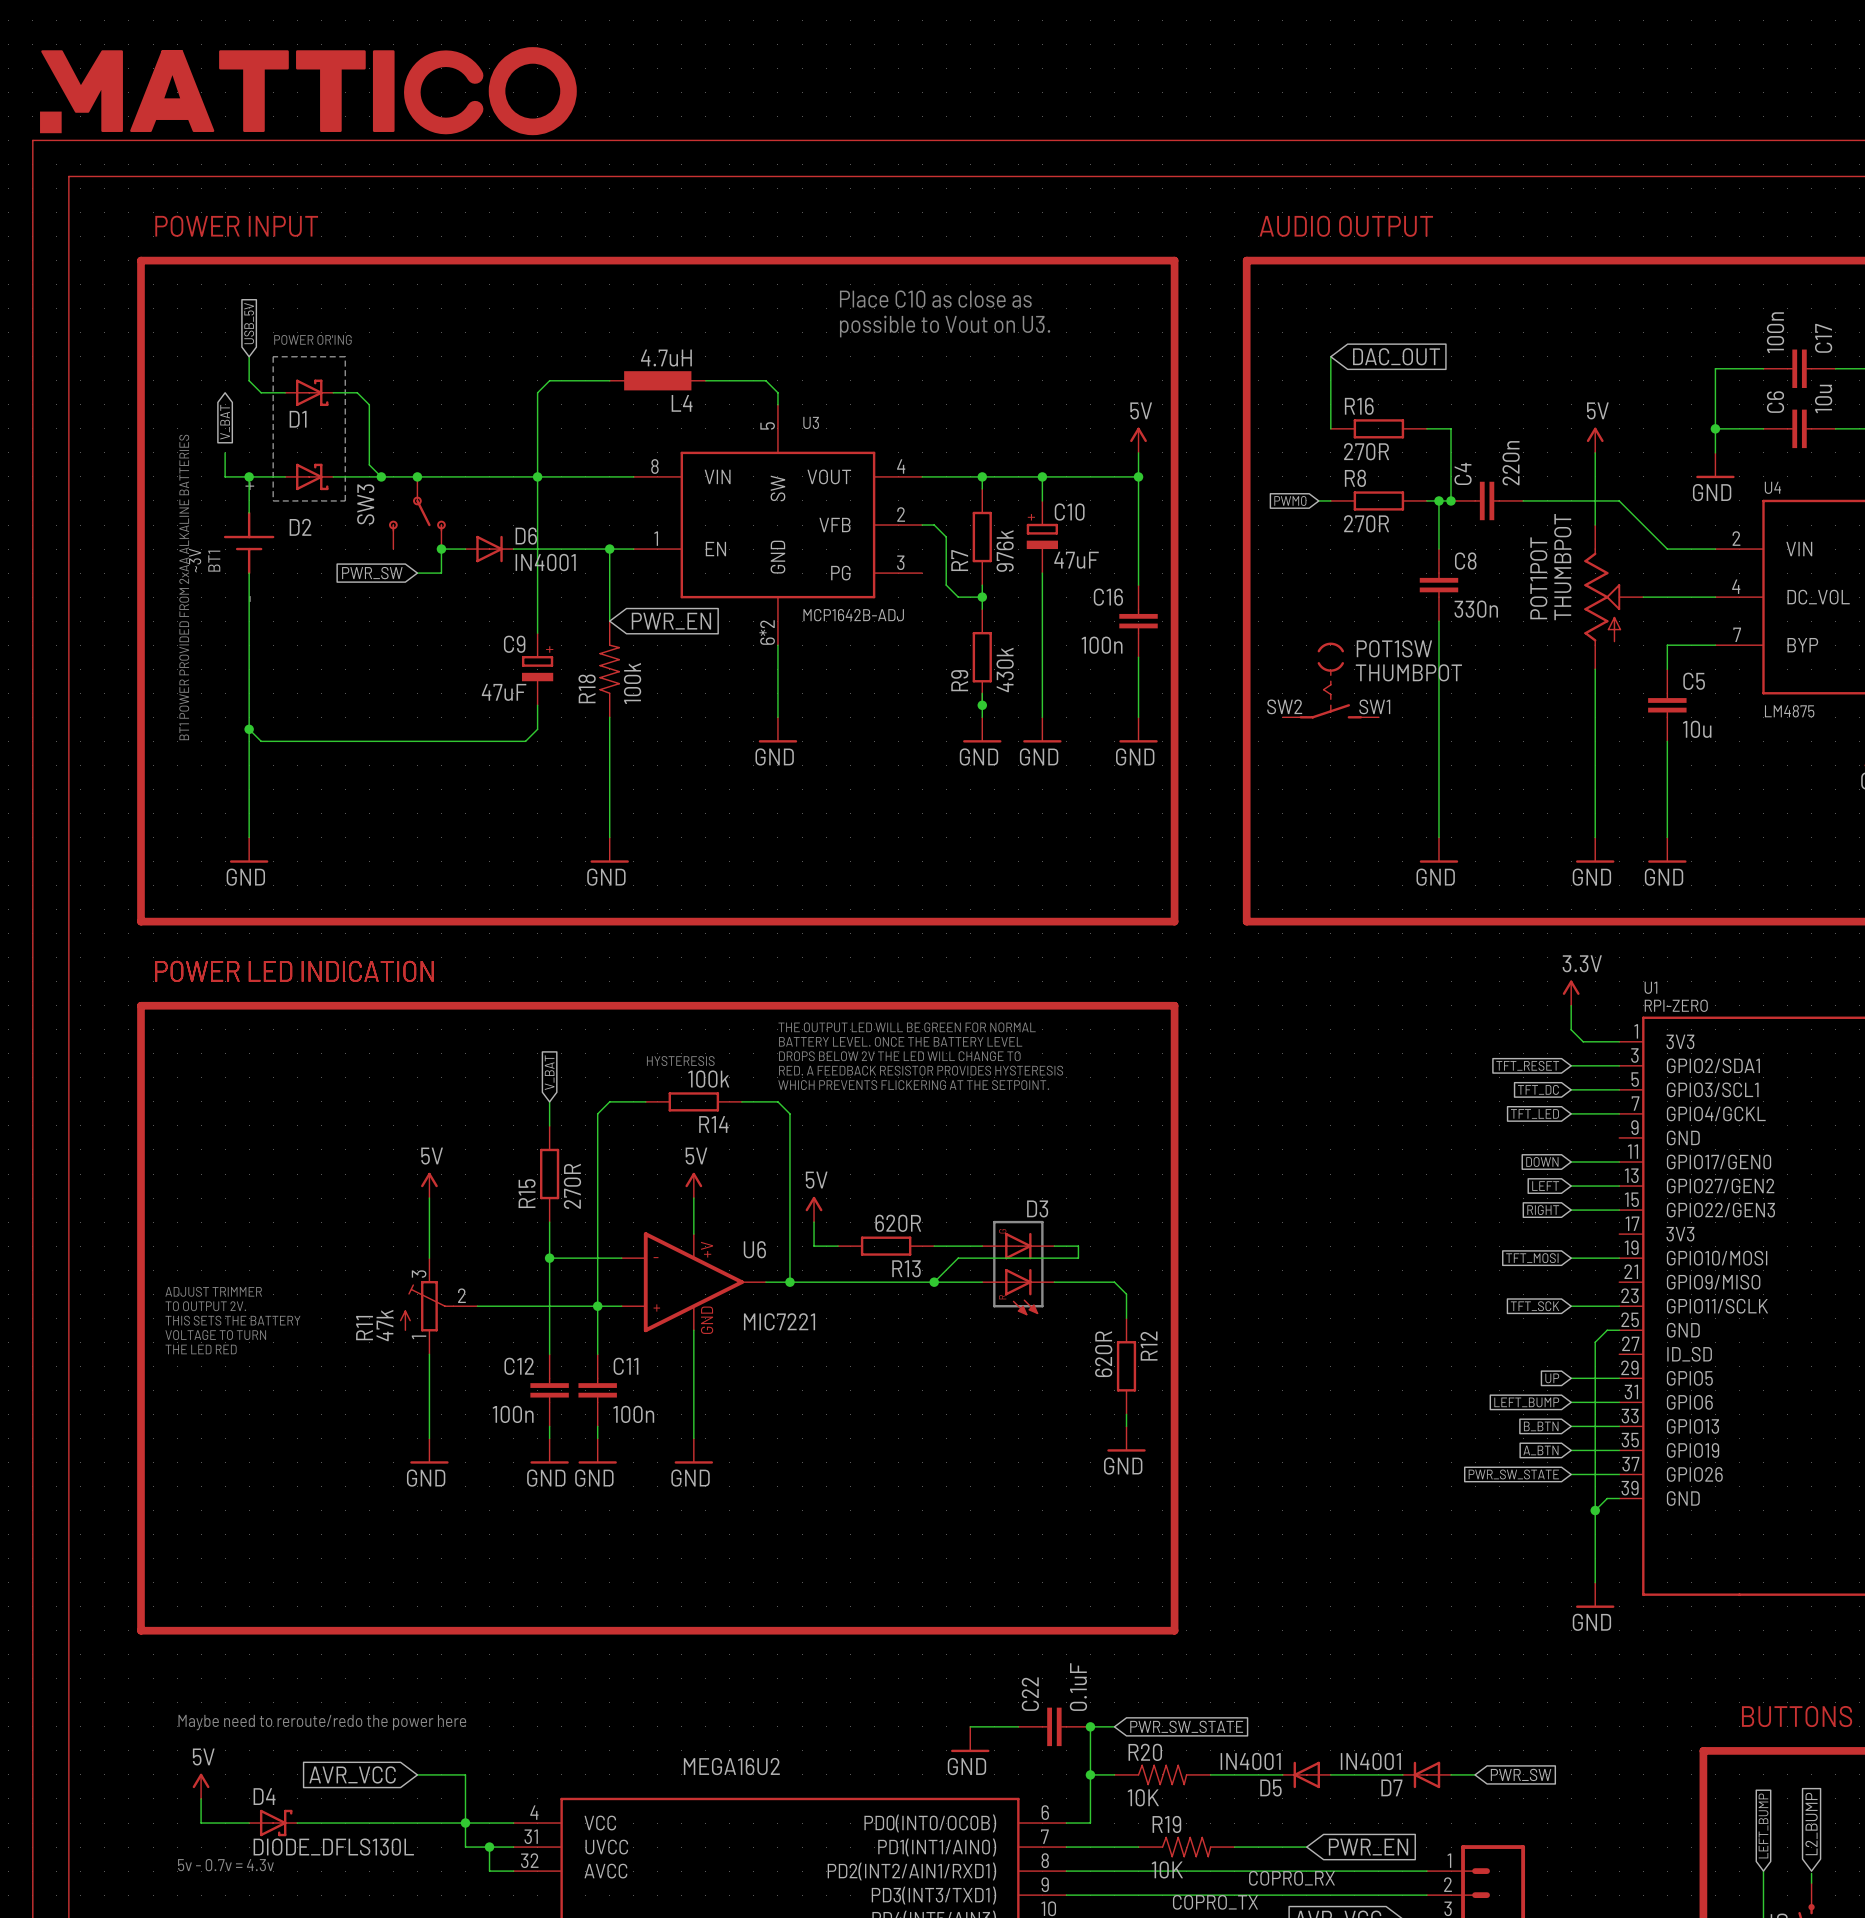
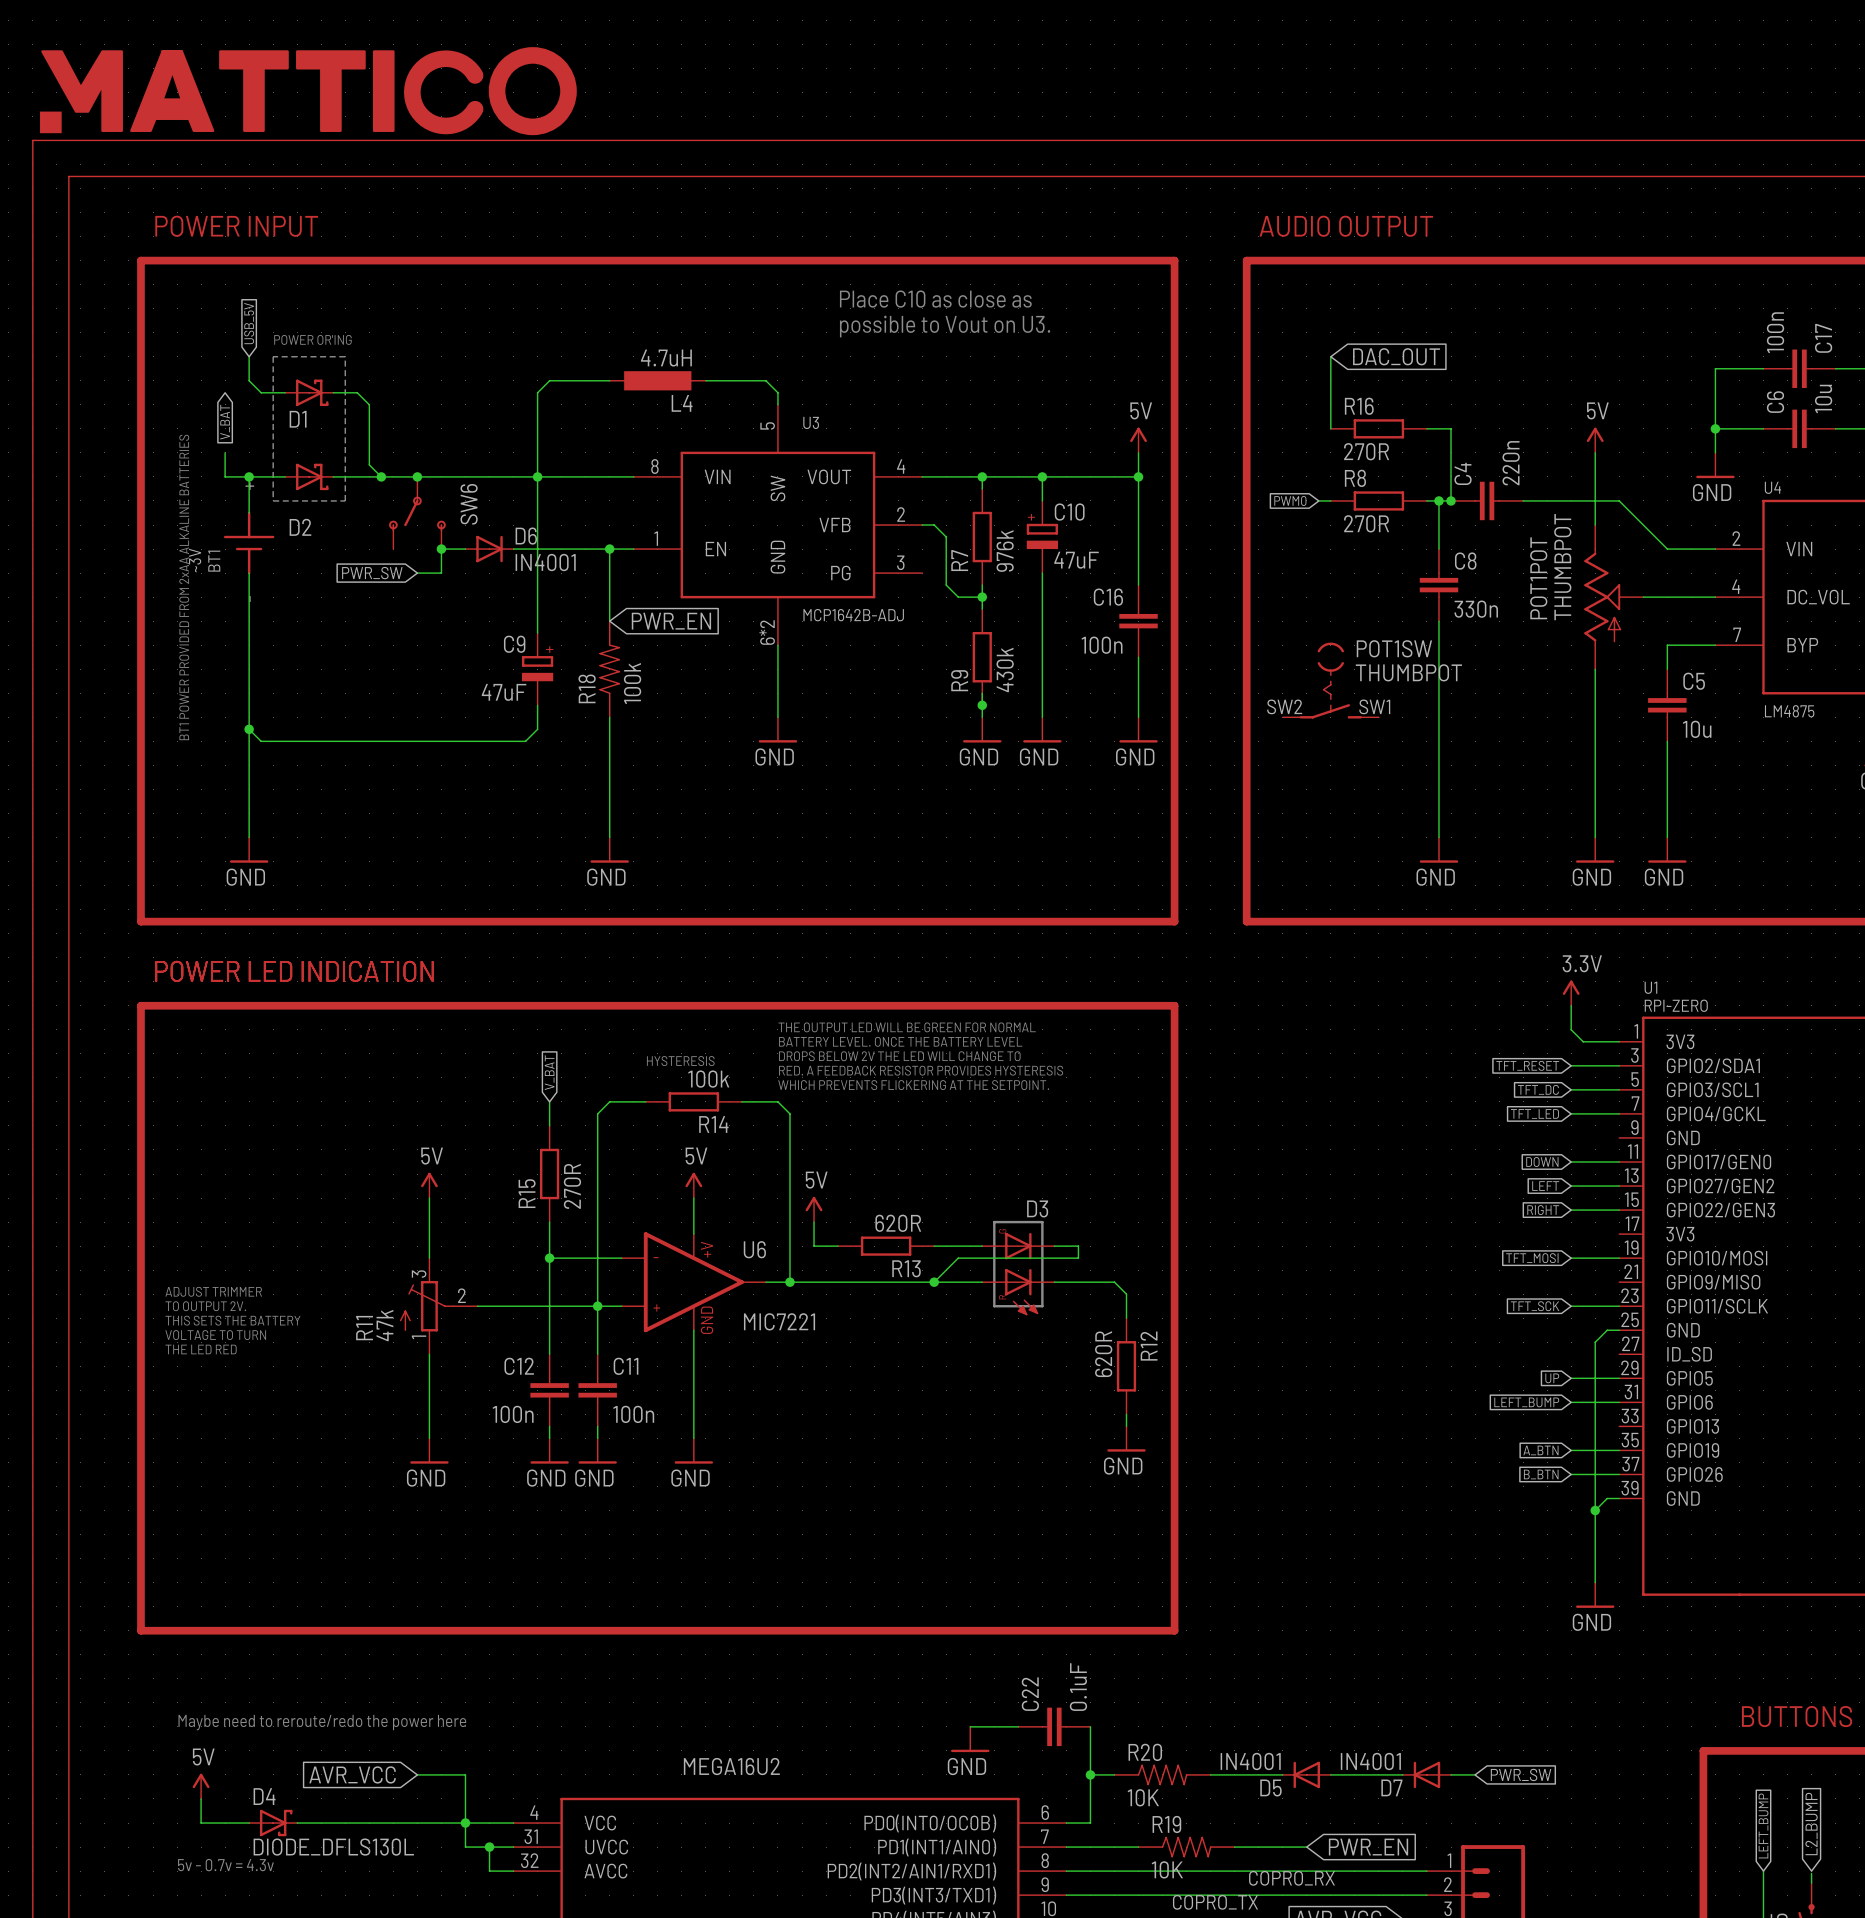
SW3: (417, 512) -> none
SW6: none -> (417, 512)
global label: B_BTN (1541, 1426) -> none
wire: (1571, 1426) (1619, 1426) -> none
global label: PWR_SW_STATE (1513, 1474) -> B_BTN (1541, 1474)
wire: (1090, 1726) (1114, 1726) -> none
junction: (1090, 1726) -> none
global label: PWR_SW_STATE (1186, 1726) -> none

